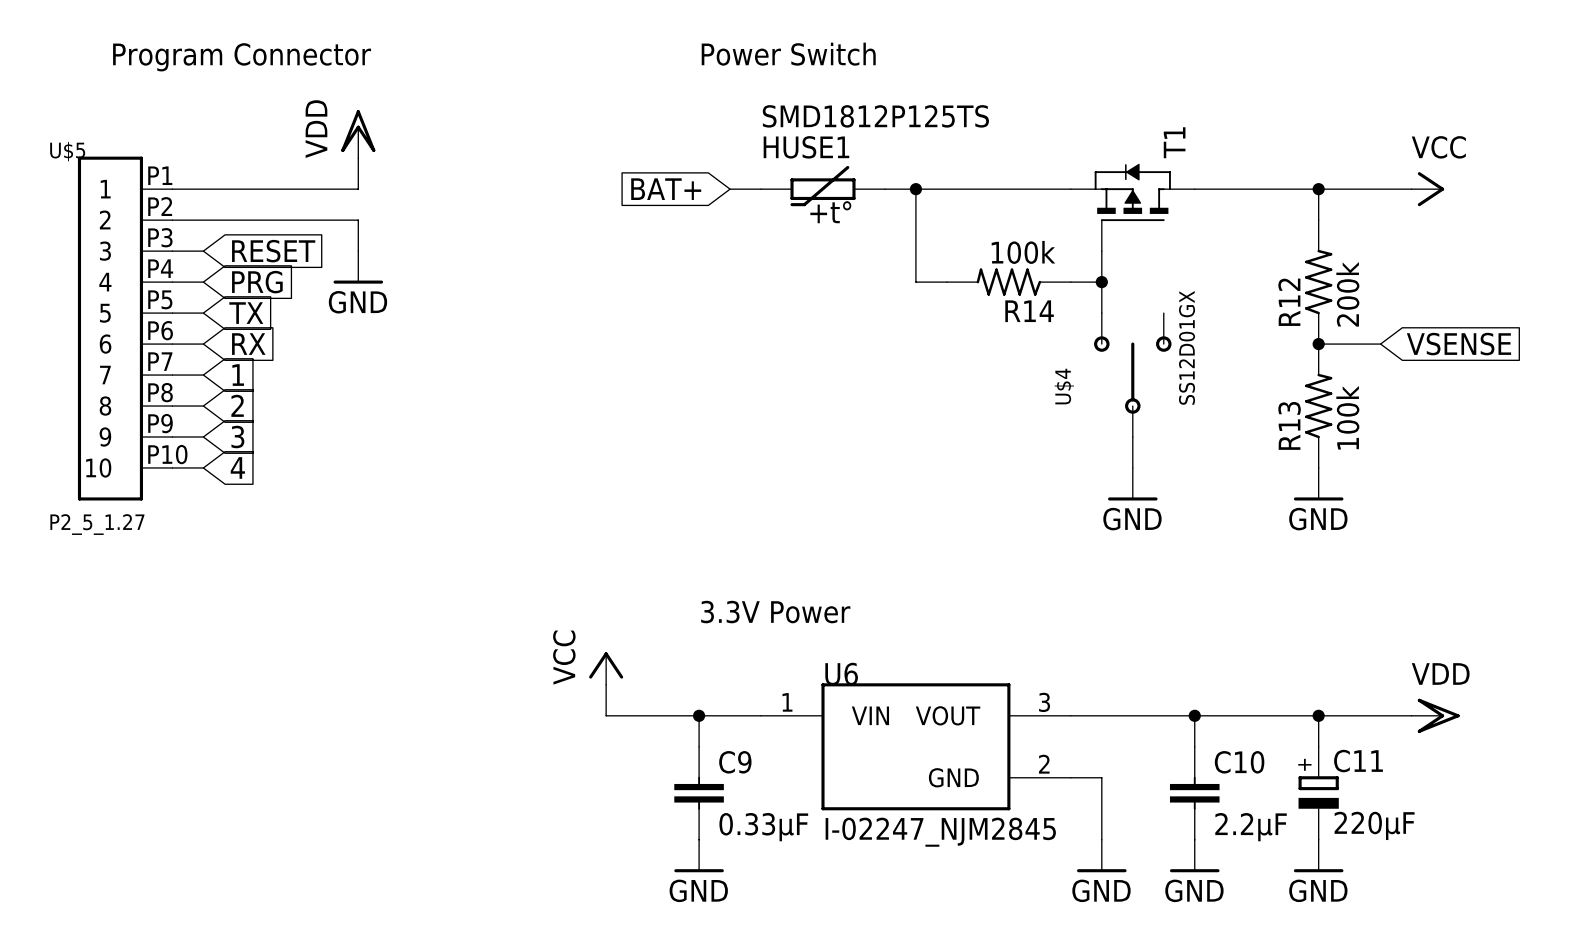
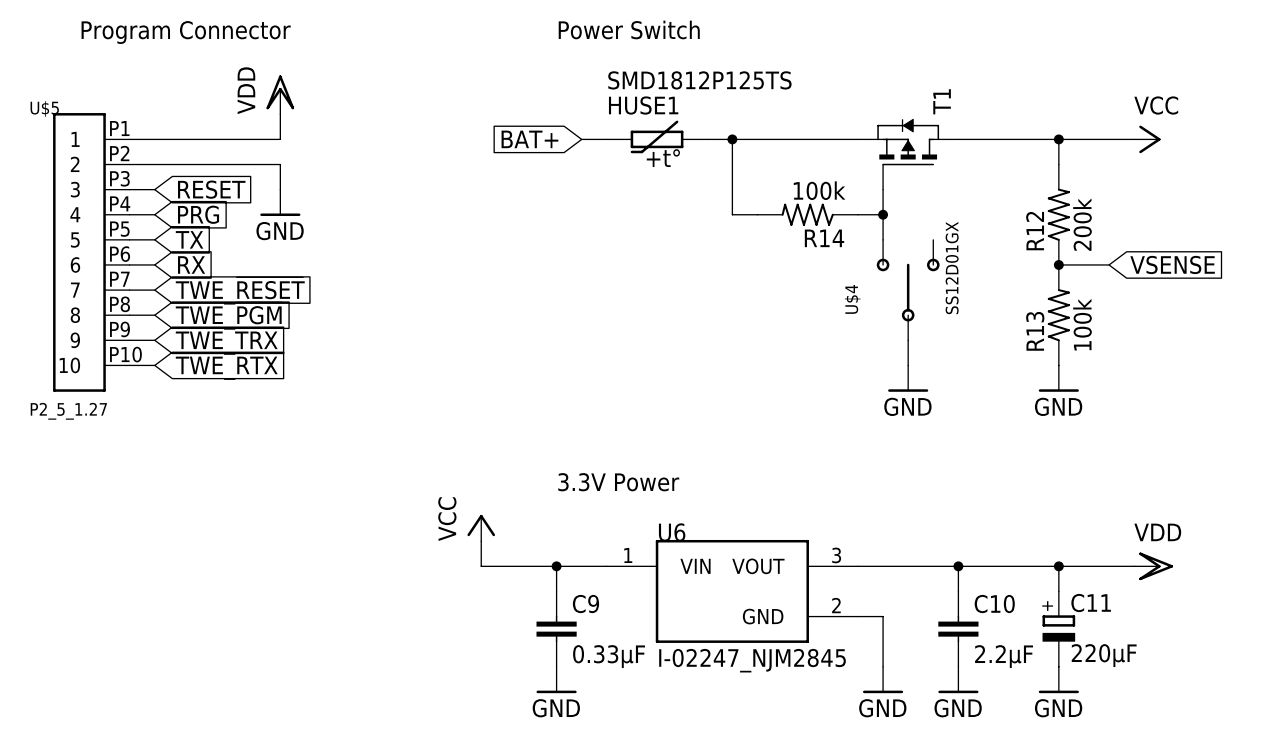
global label: 1 (238, 375) -> TWE_~{RESET} (240, 290)
global label: 2 (237, 405) -> TWE_~{PGM} (229, 316)
global label: 3 (237, 437) -> TWE_TRX (226, 343)
global label: 4 (237, 467) -> TWE_RTX (226, 368)

